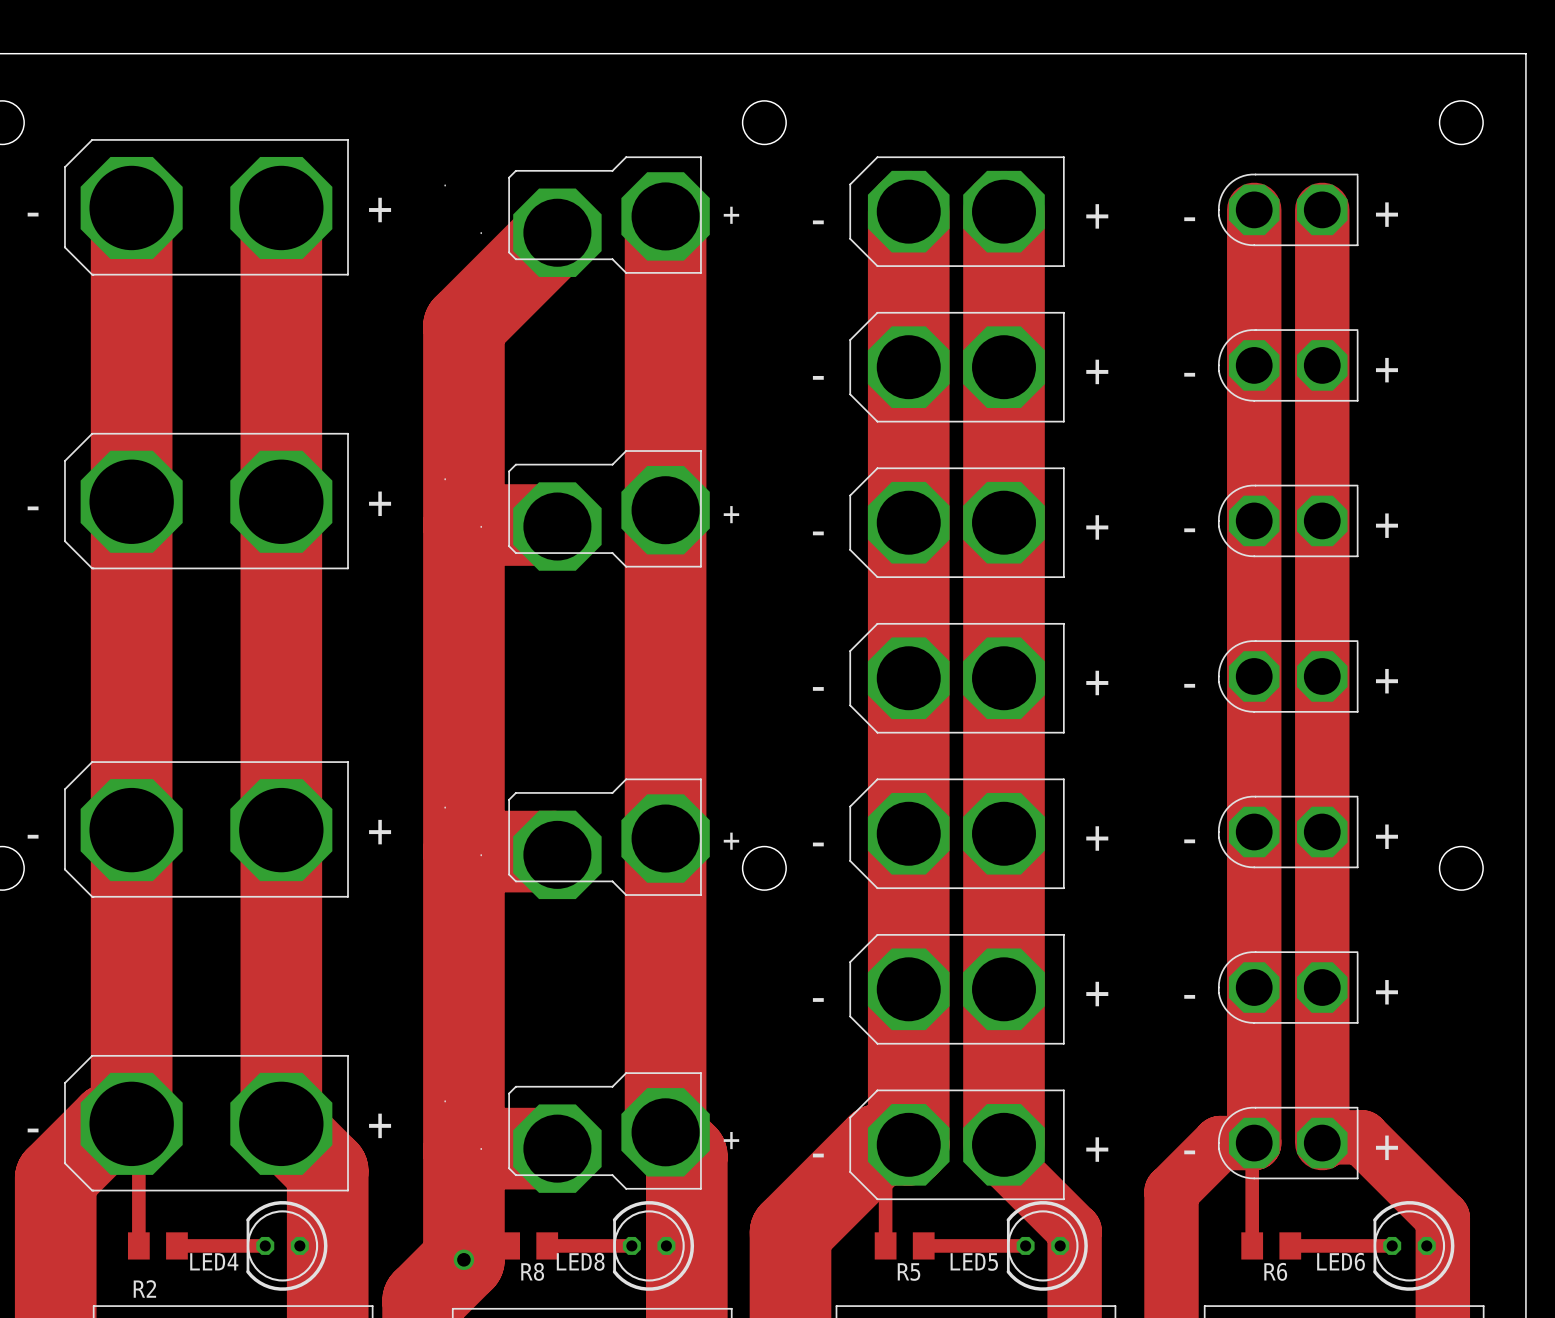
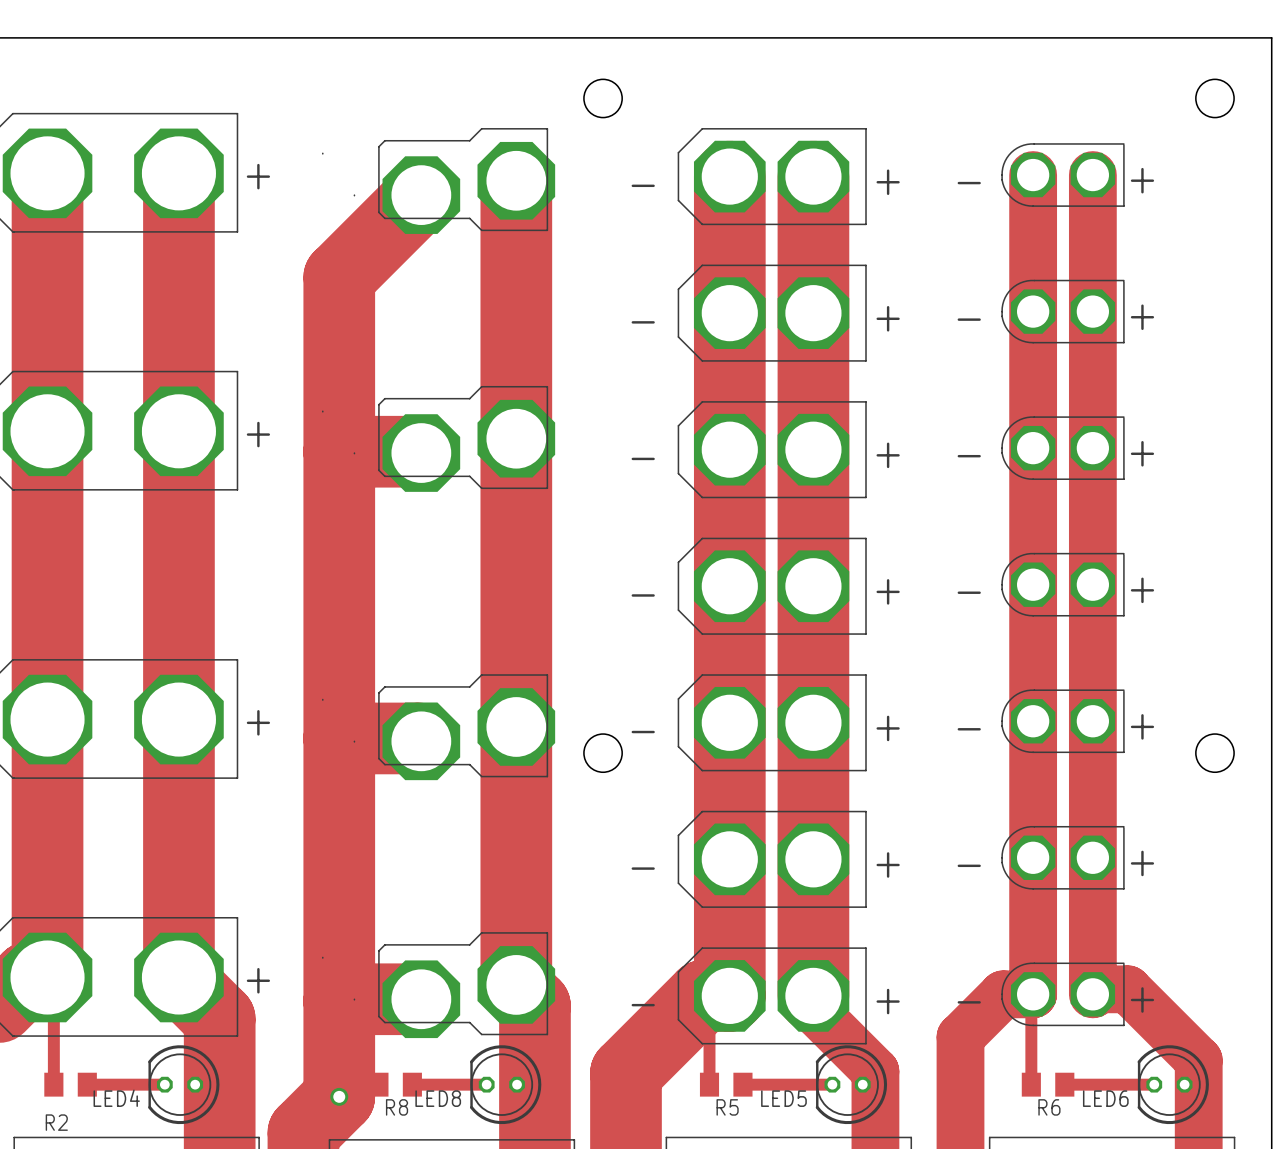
text: + (731, 215) -> none
text: + (731, 514) -> none
text: + (731, 841) -> none
text: + (731, 1140) -> none

